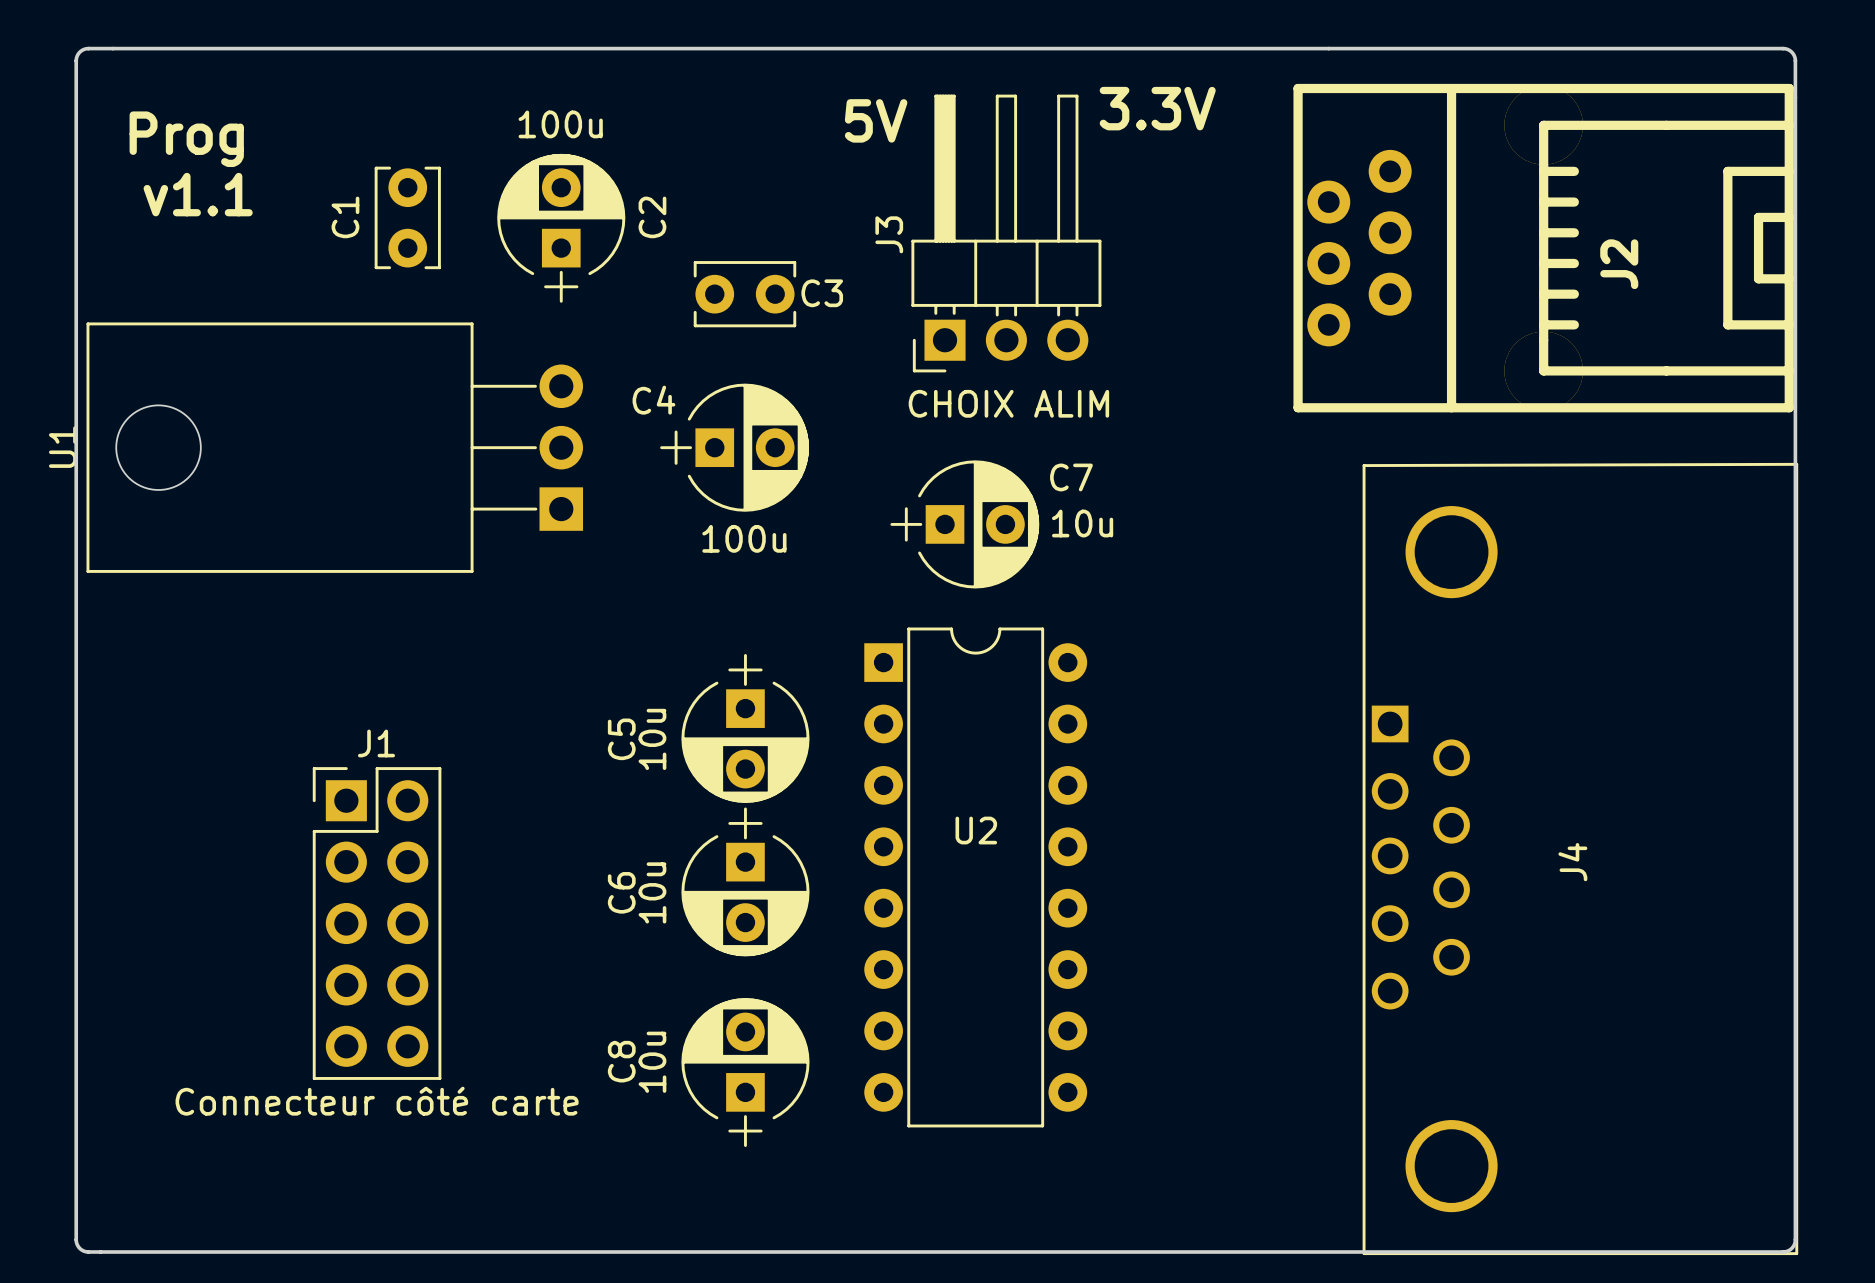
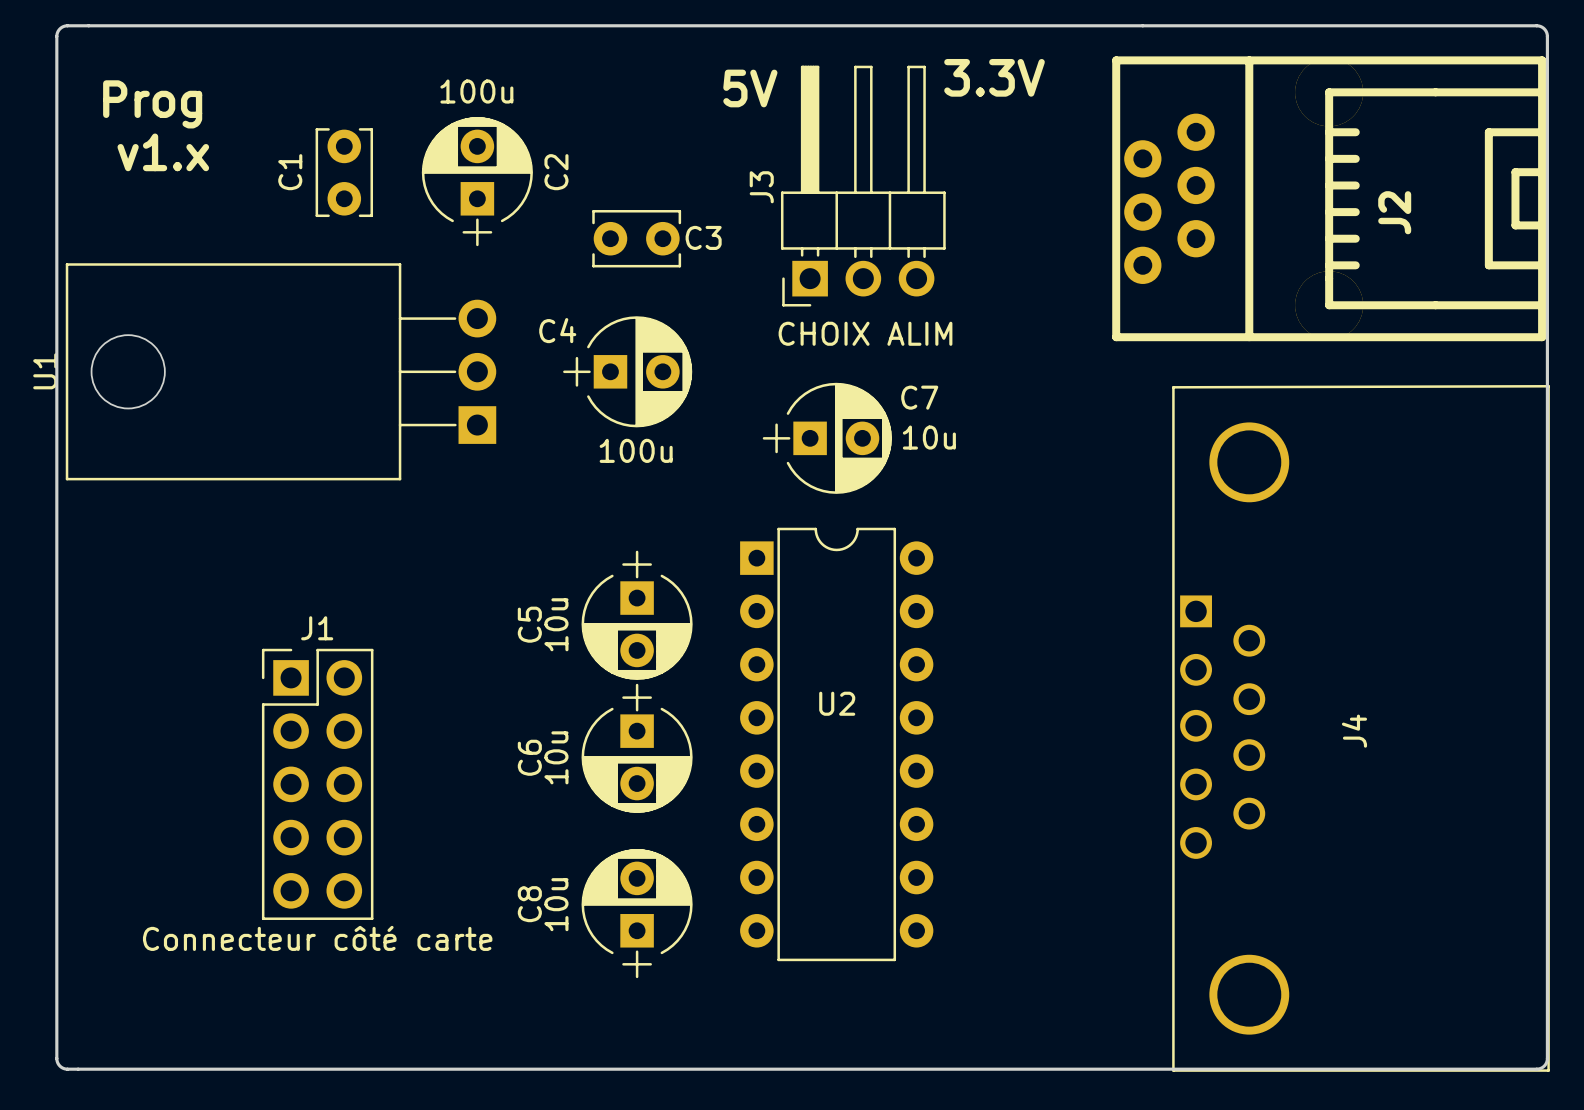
text: v1.1 (198, 194) -> v1.x (163, 152)

